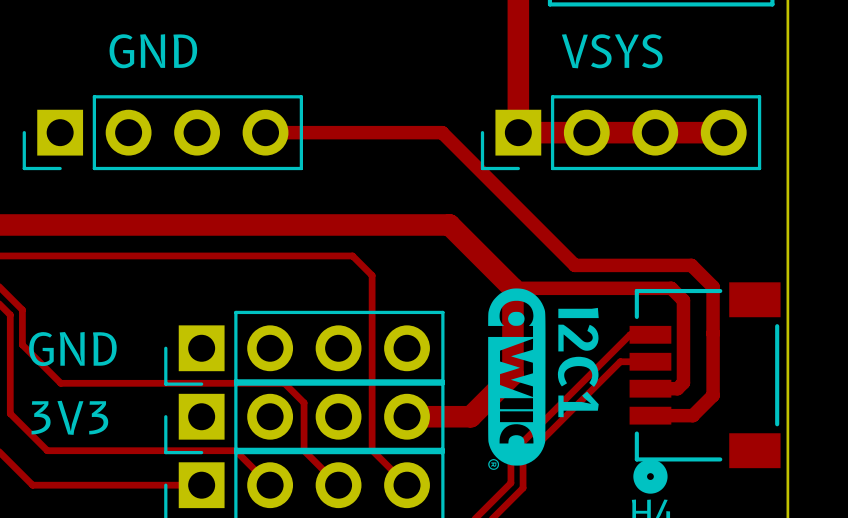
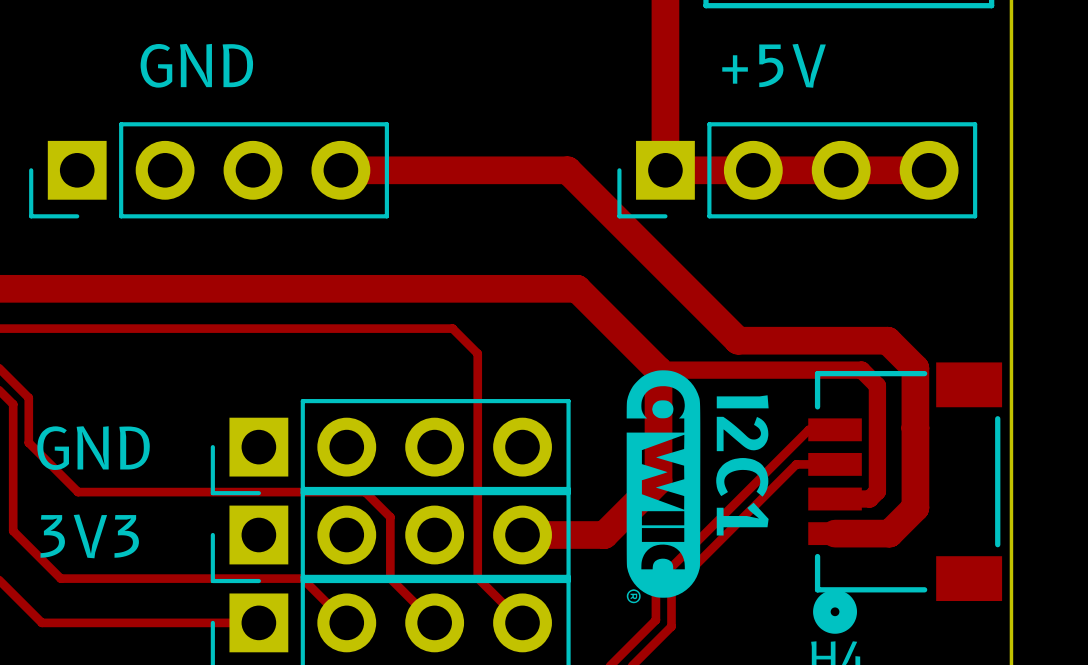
text: VSYS (612, 51) -> +5V (774, 65)
track width: thin (265, 132) (442, 132) (574, 265) (691, 265) (713, 286) (713, 395) (692, 415) (650, 415) -> thick (340, 170) (567, 170) (738, 340) (887, 340) (915, 368) (915, 507) (889, 533) (835, 533)

